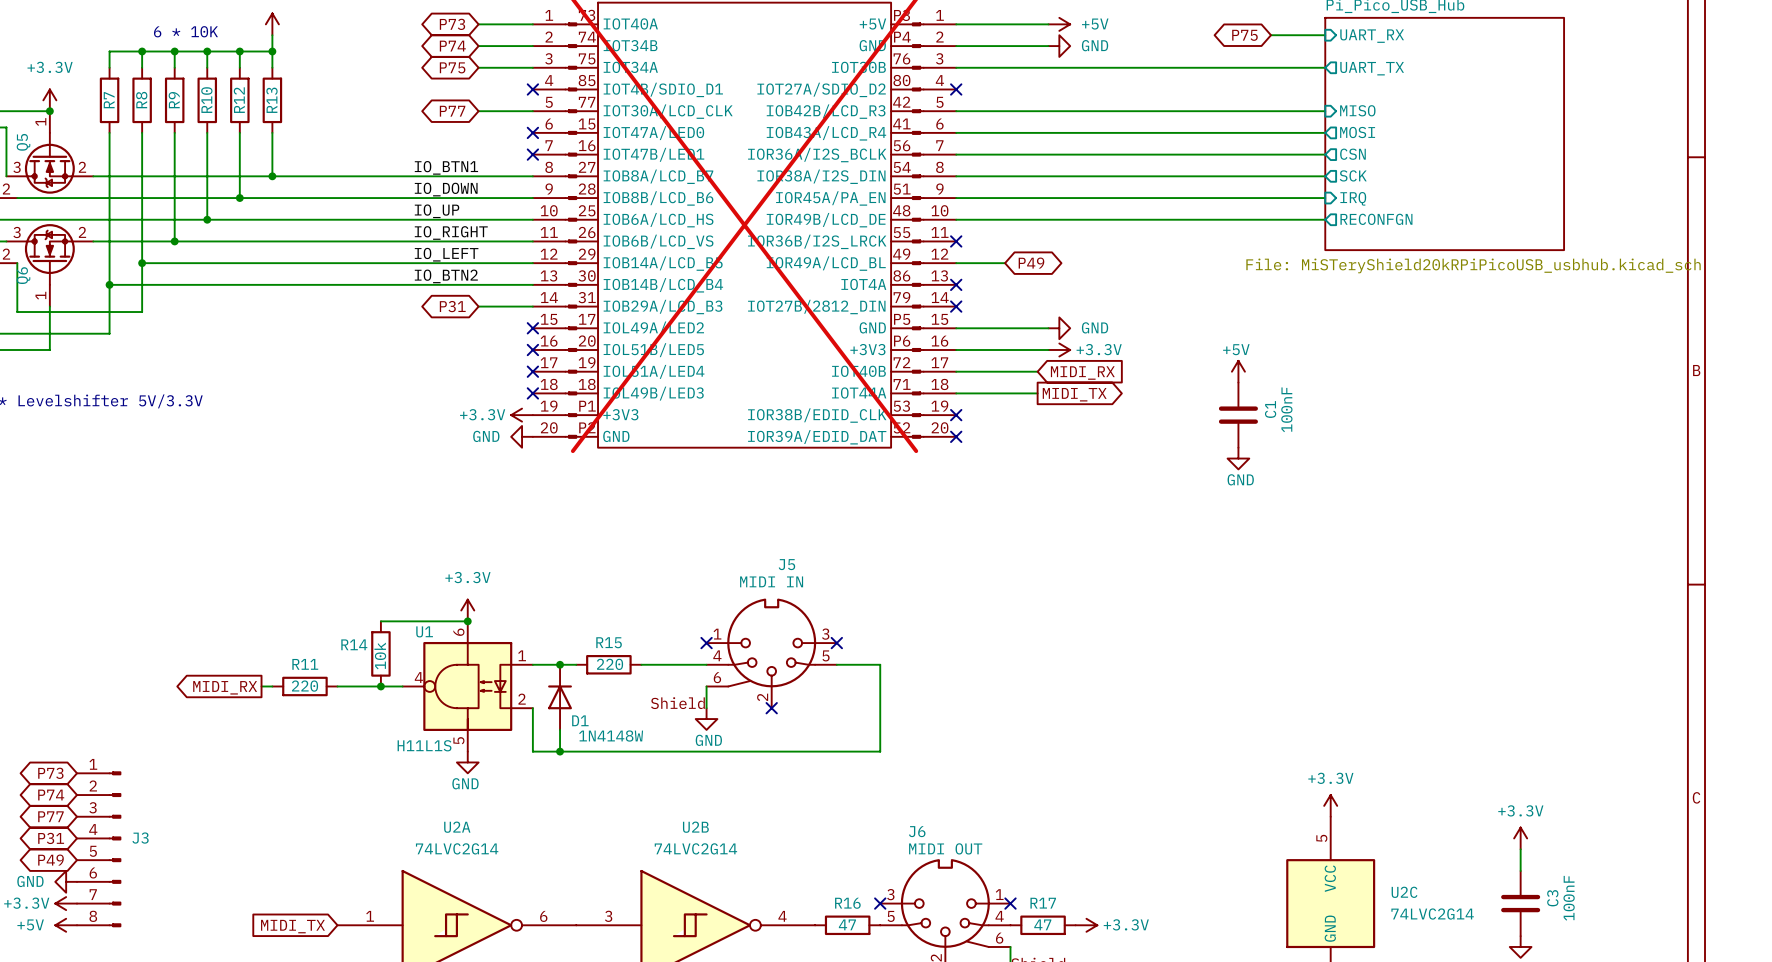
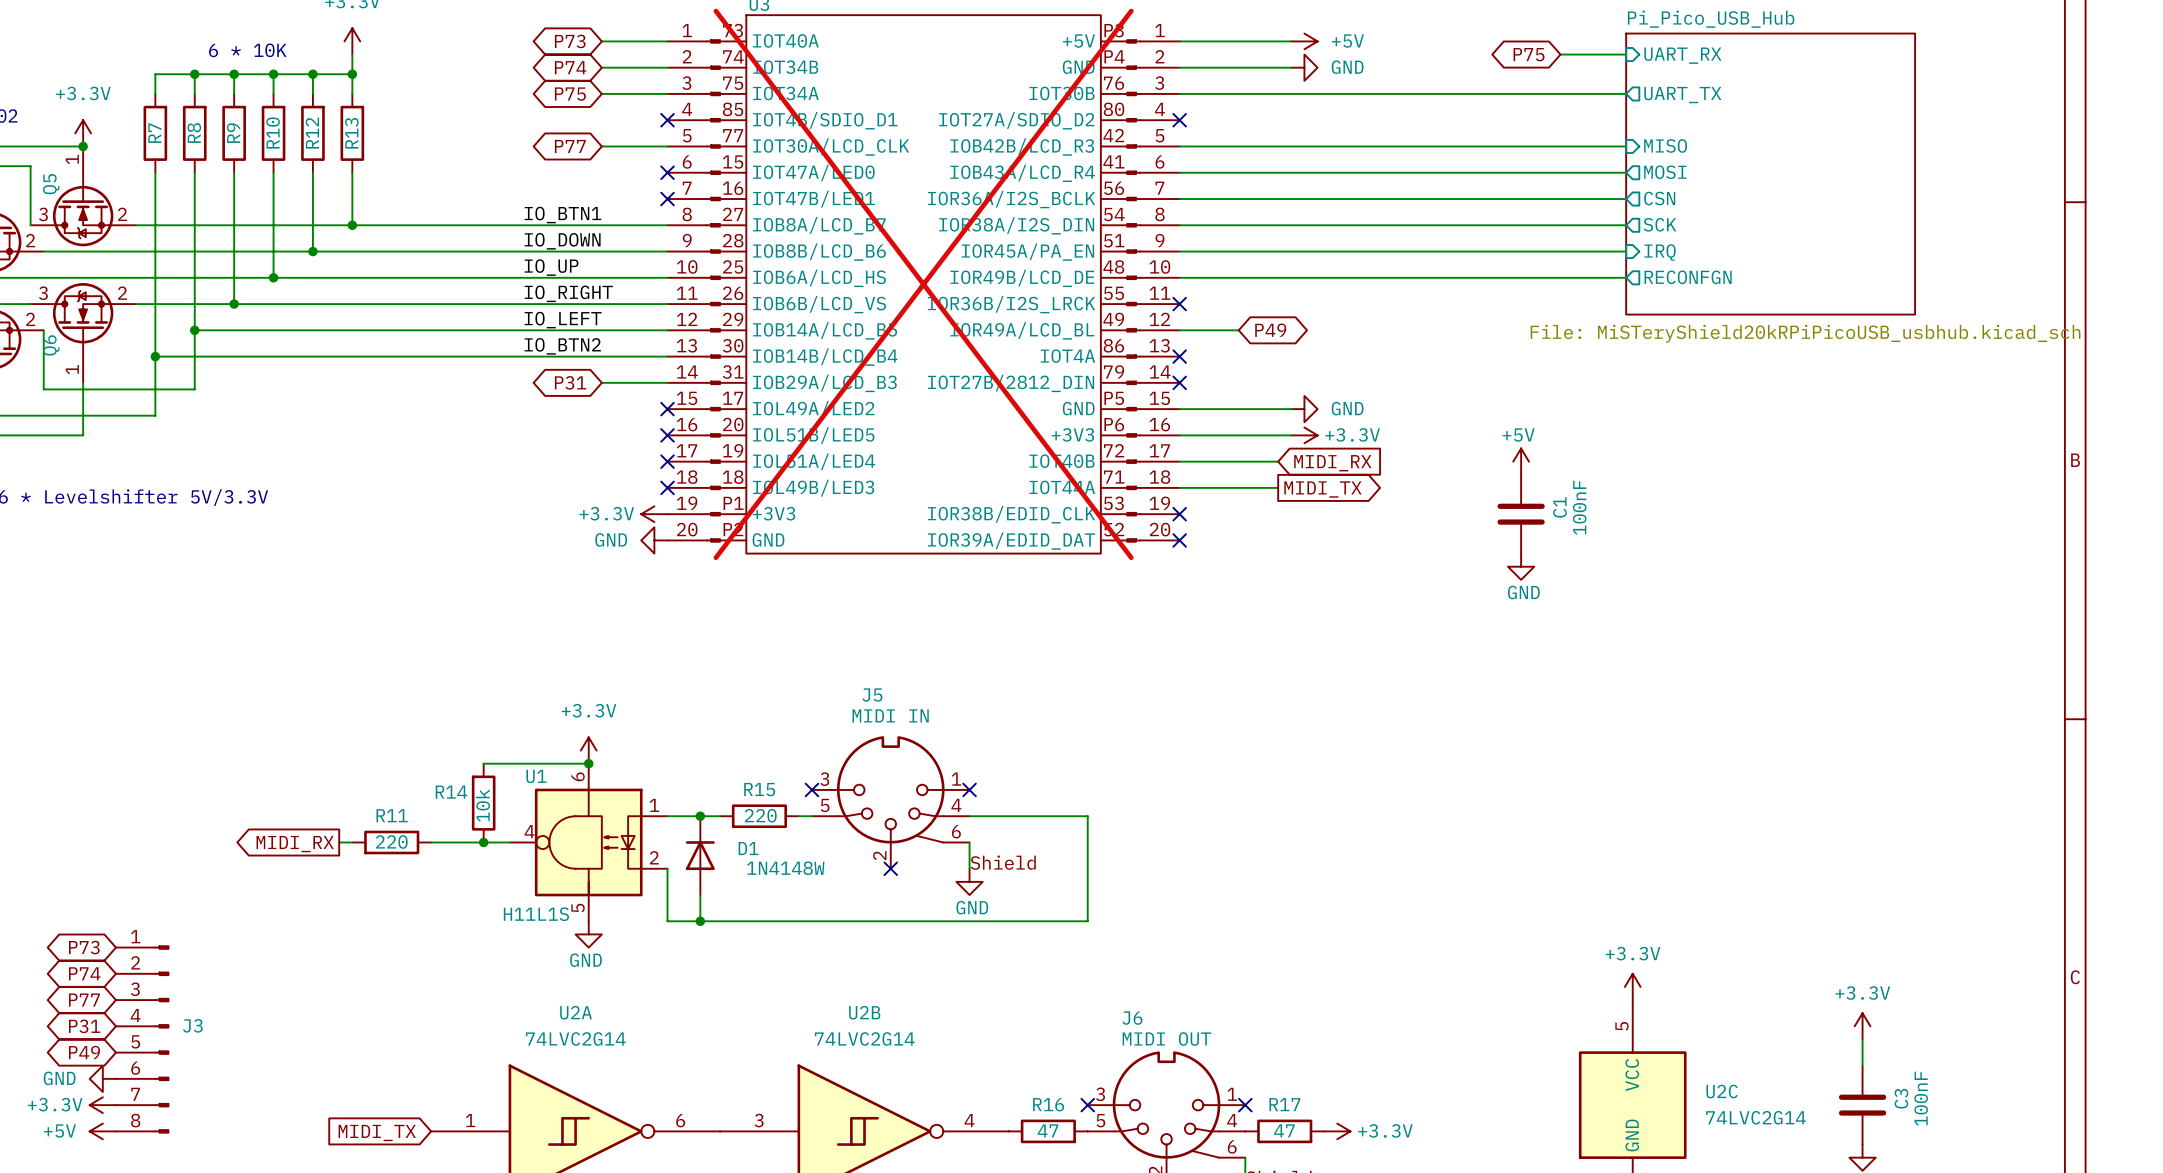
J5 flip: as is (771, 642) -> left-right (890, 789)
no-connect mark: none -> (811, 789)
no-connect mark: (706, 643) -> none
no-connect mark: none -> (969, 789)
no-connect mark: (836, 643) -> none
wire: (706, 686) (706, 708) -> (969, 842) (969, 868)
no-connect mark: none -> (890, 868)
no-connect mark: (771, 708) -> none
power symbol position: GND (706, 719) -> GND (969, 881)
D1 name position: D1 (580, 720) -> D1 (748, 848)
D1 value position: 1N4148W (611, 736) -> 1N4148W (785, 868)

